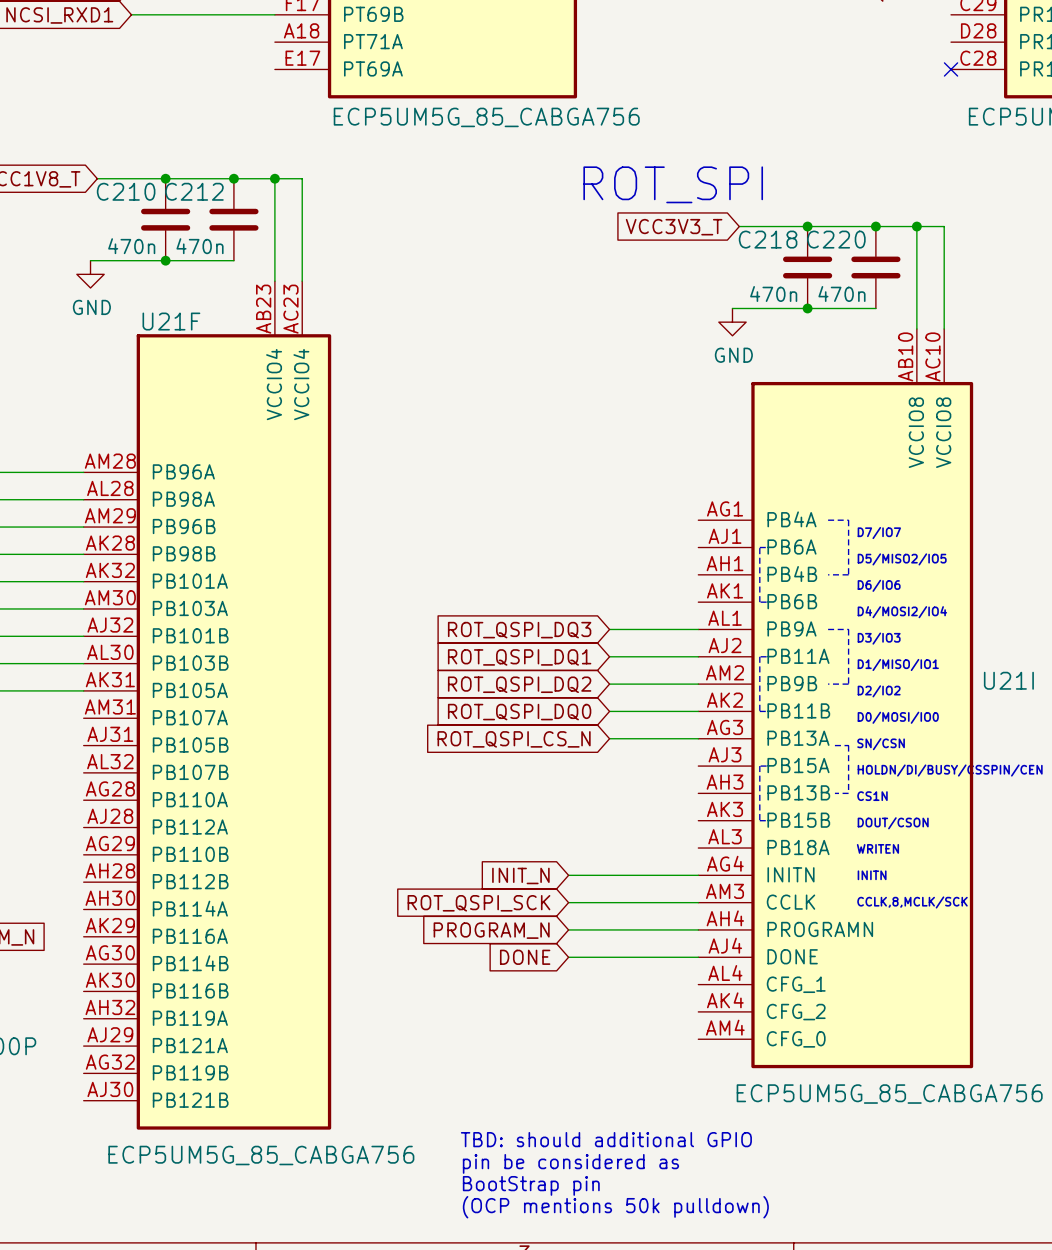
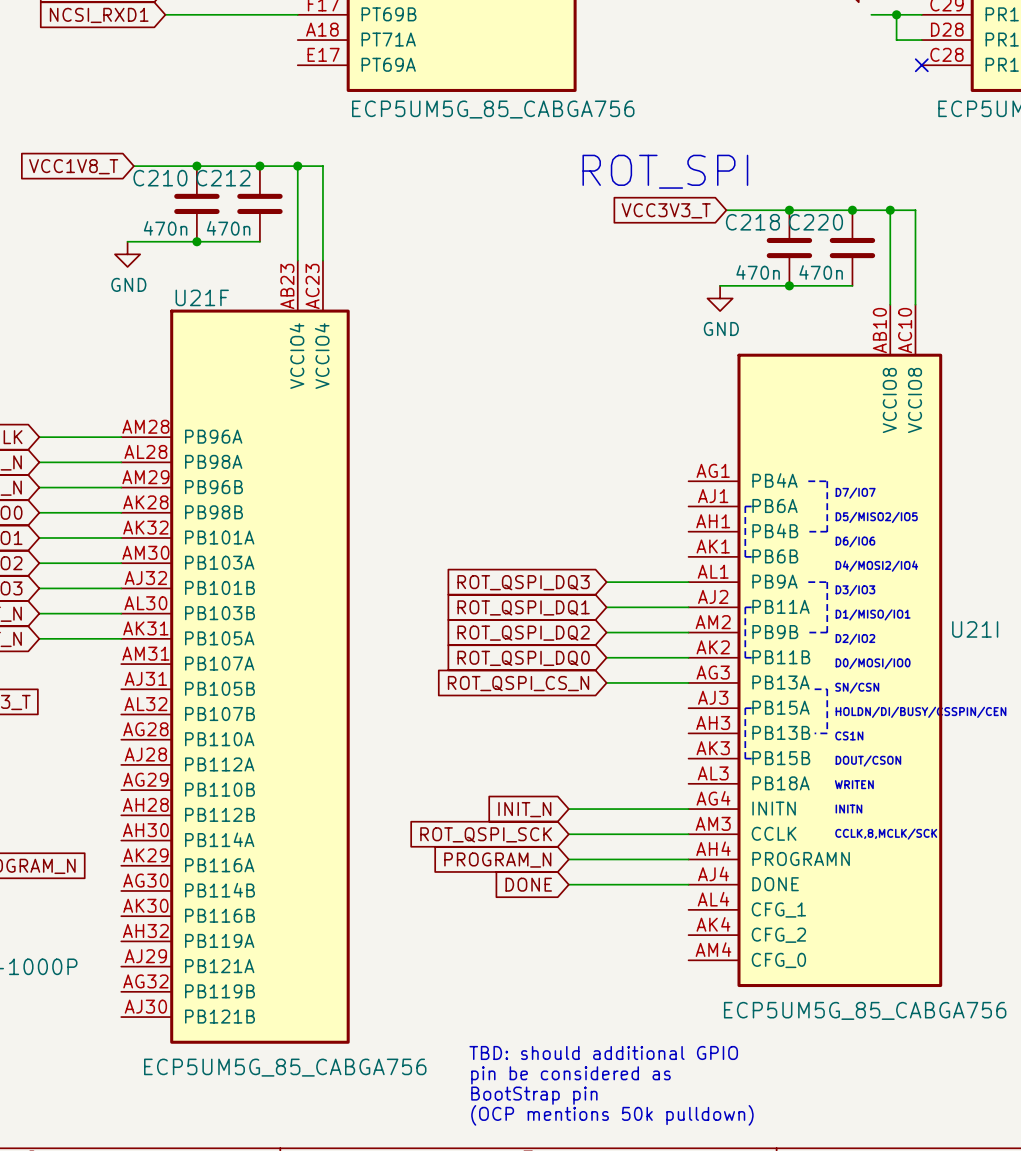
wire: none -> (871, 14) (921, 14)
wire: none -> (896, 14) (896, 40) (921, 40)
junction: none -> (896, 14)

